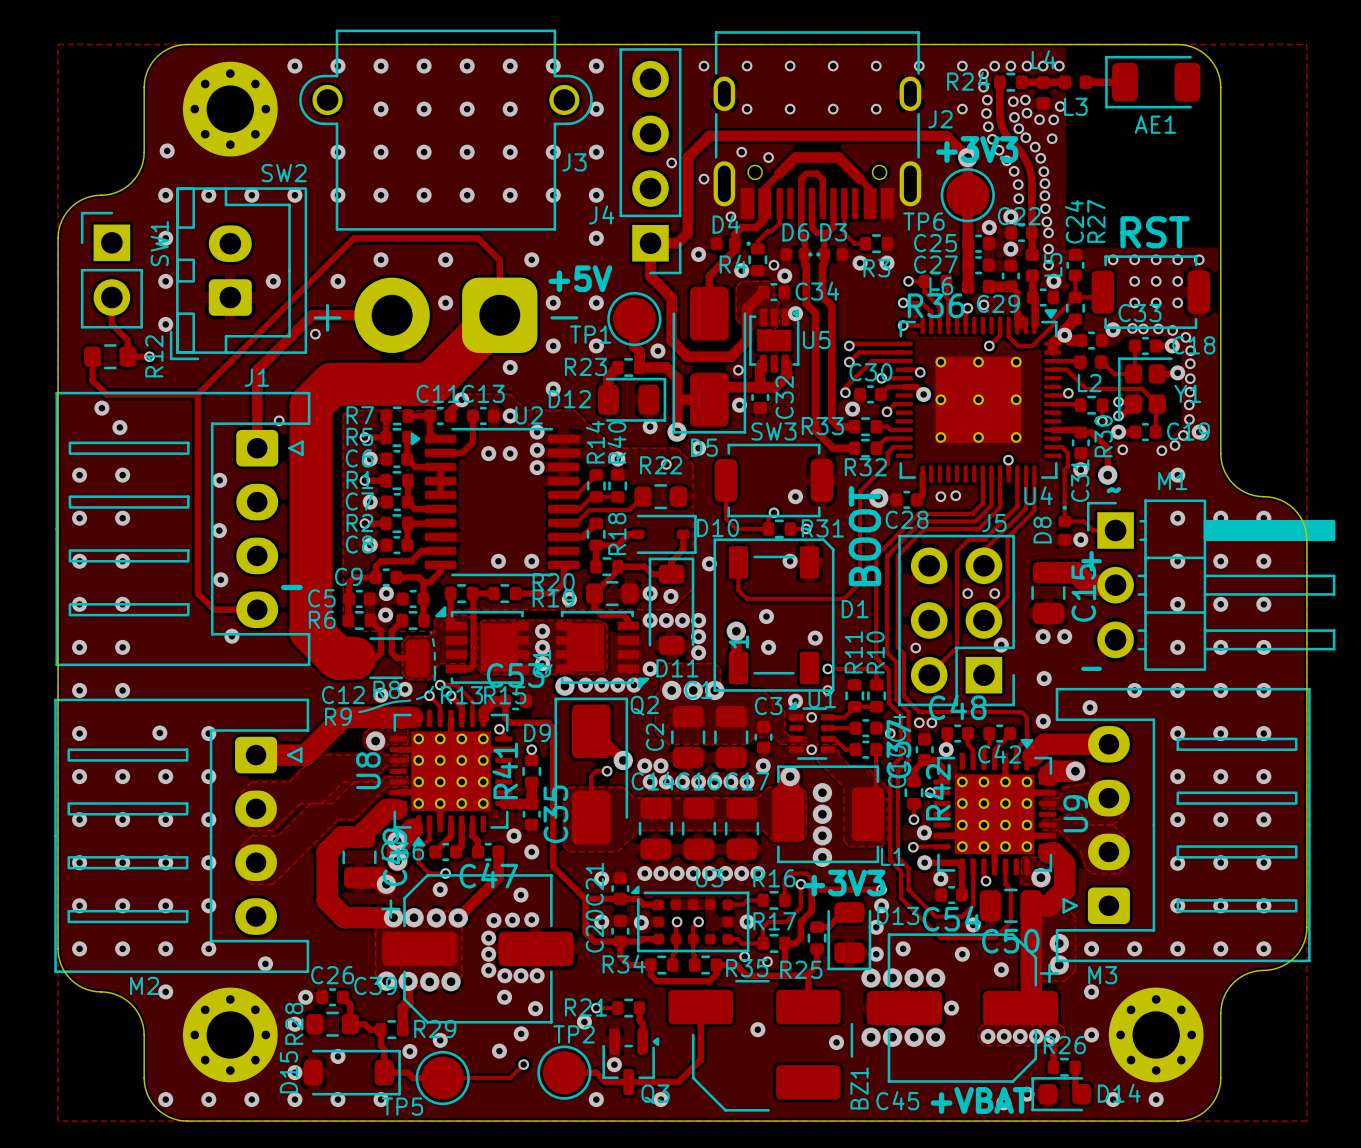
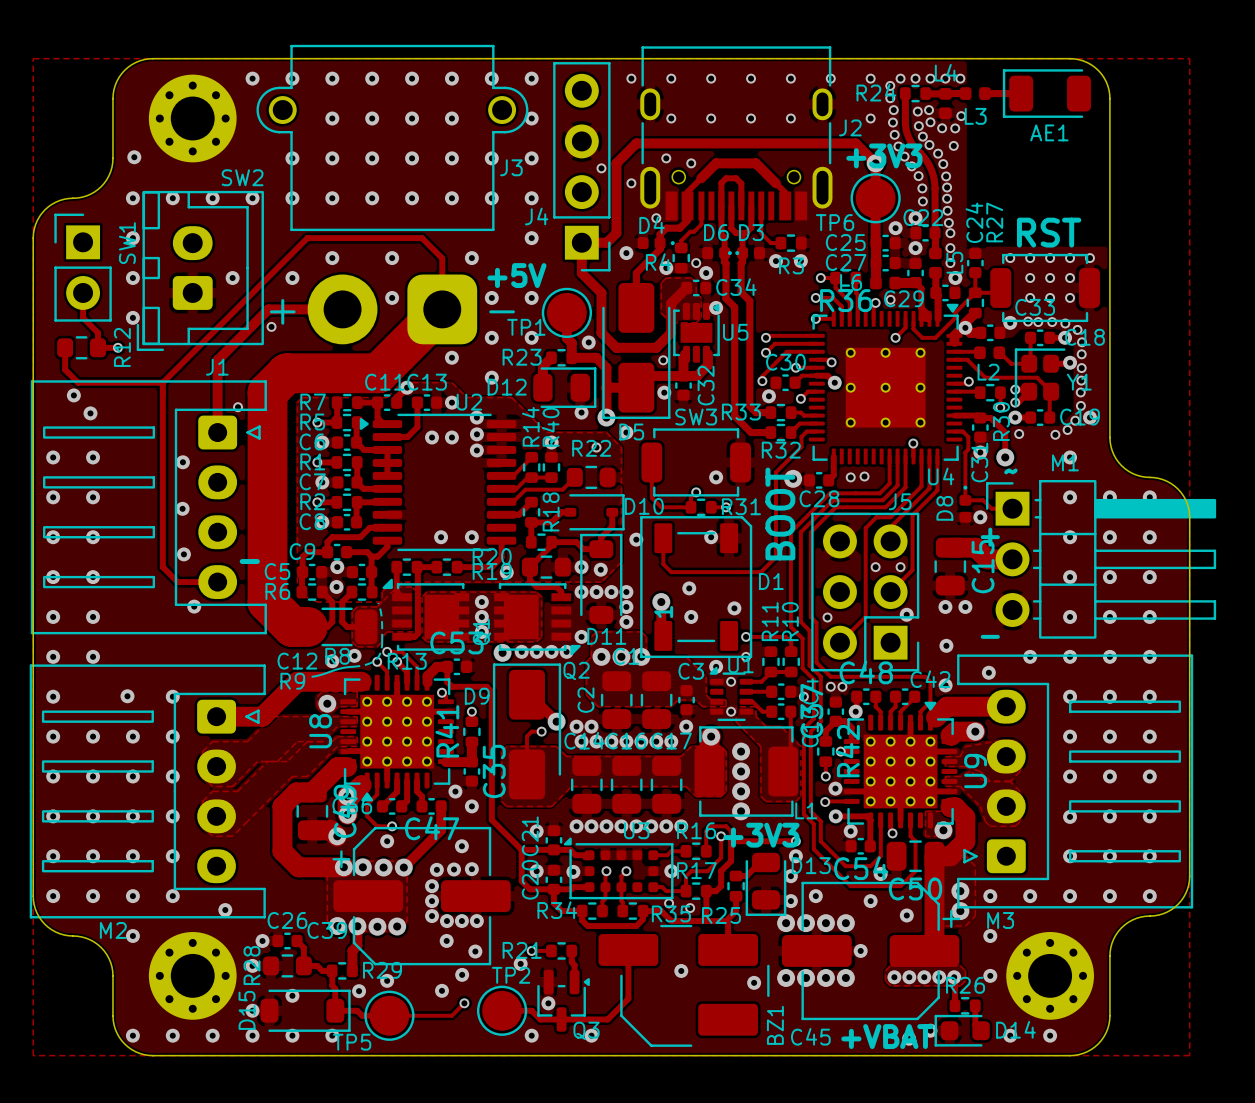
R15 name: R15 (505, 695) -> none
C42 name position: C42 (999, 754) -> C42 (930, 679)

